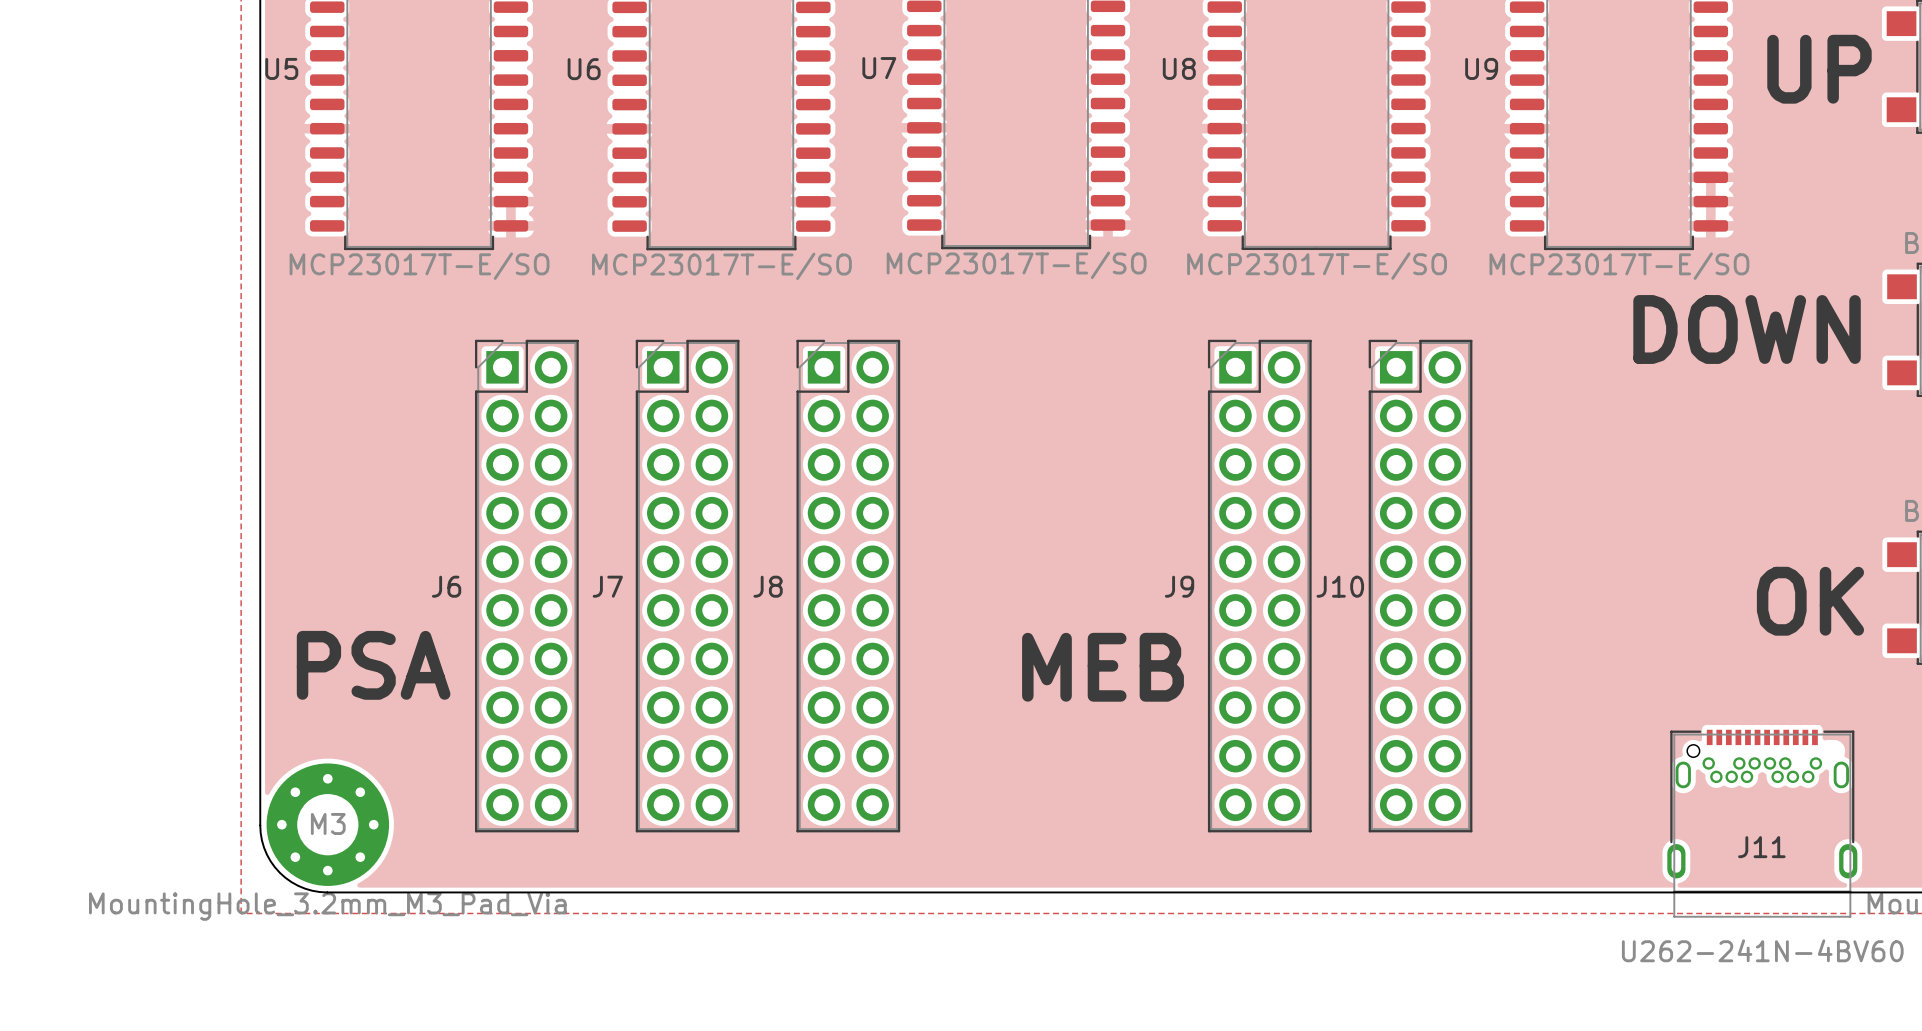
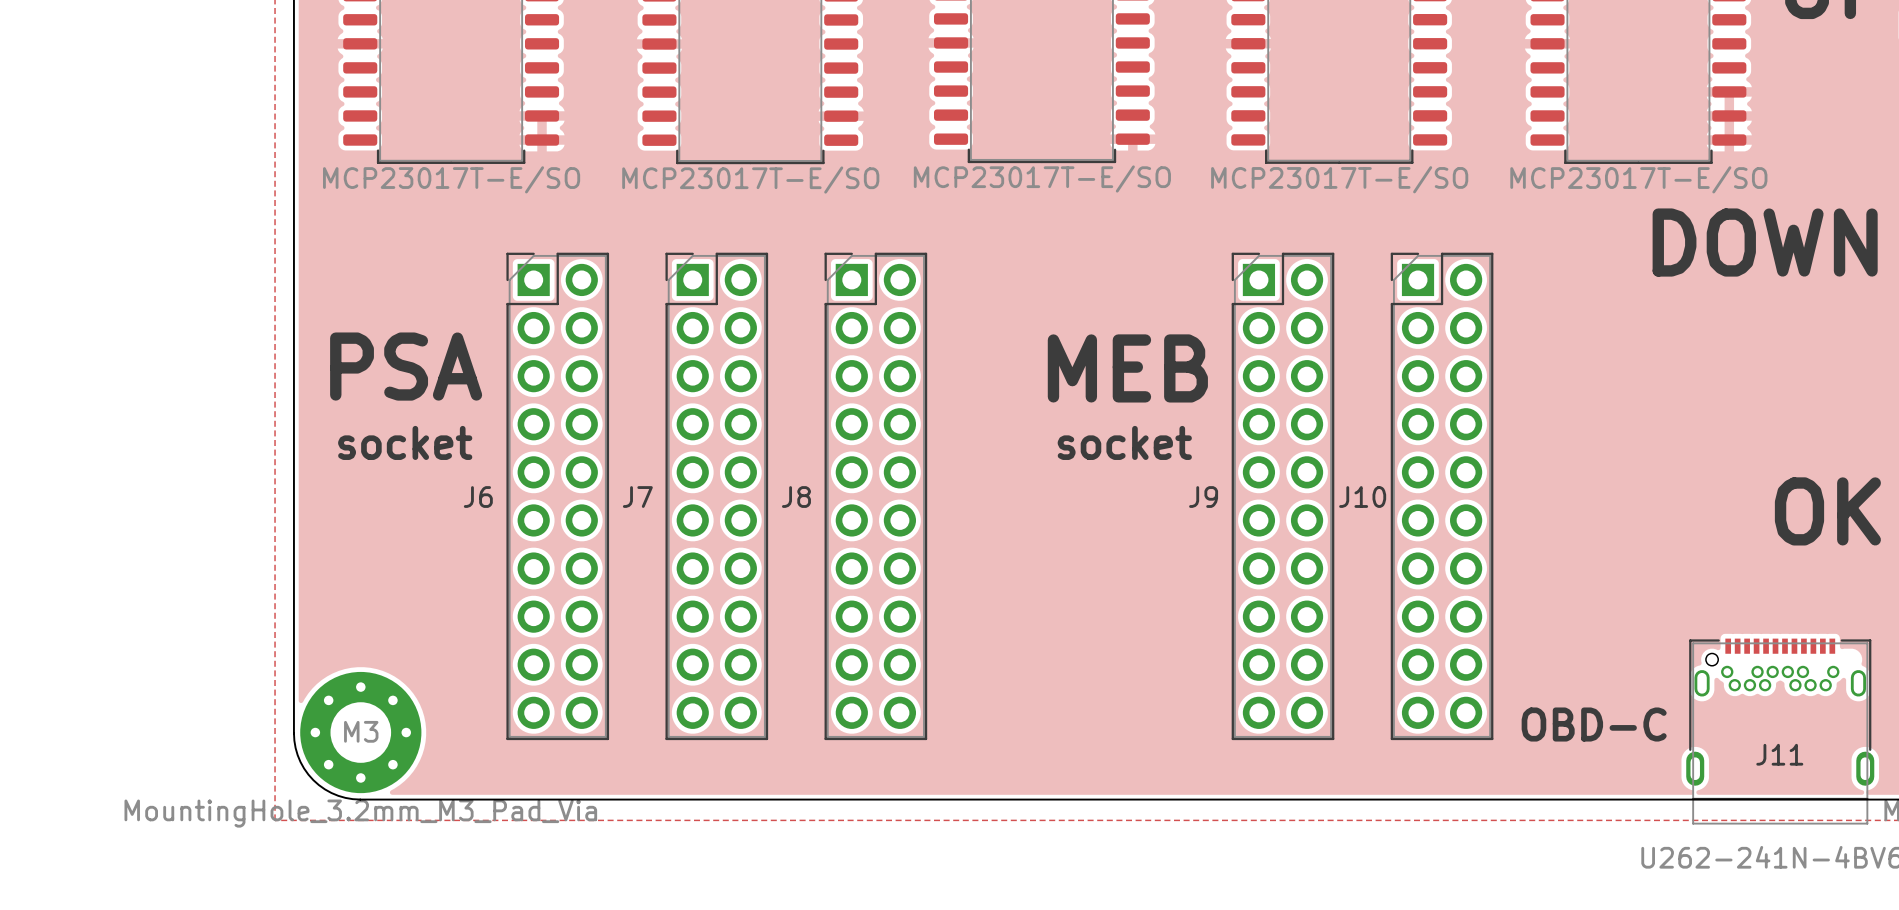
text: none -> socket (405, 442)
text: none -> socket (1124, 442)
text position: PSA (373, 665) -> PSA (406, 366)
text position: MEB (1103, 667) -> MEB (1127, 368)
text: none -> OBD-C (1594, 724)

